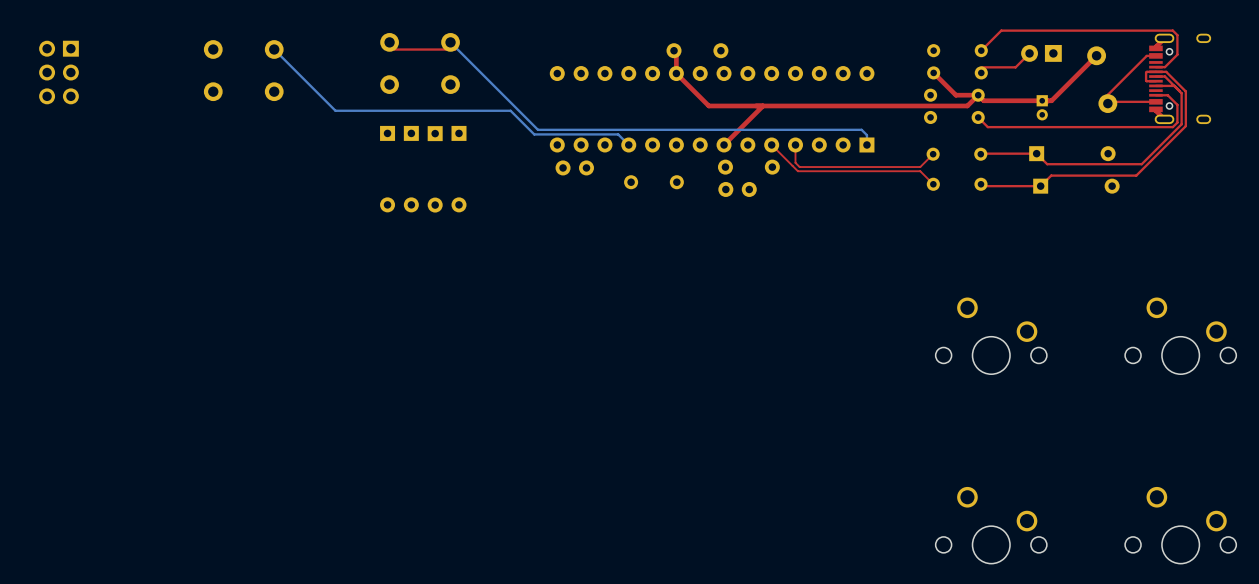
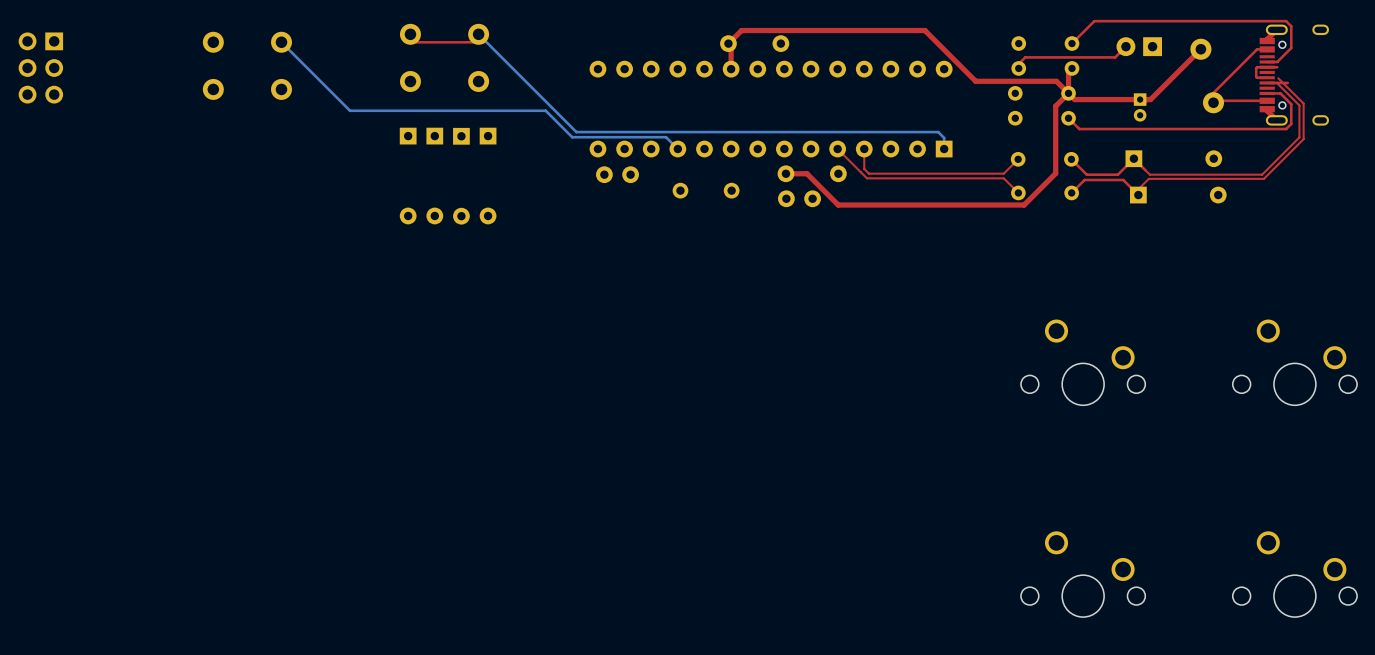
top track: none -> (728, 43) (741, 30) (924, 30) (975, 81) (1056, 81) (1068, 93) (1067, 68)
top track: (1019, 63) (1015, 67) (981, 67) -> (1115, 57) (1025, 57) (1014, 68)
top track: (1164, 71) (1185, 91) (1185, 126) (1136, 175) (1051, 175) (1040, 186) (982, 186) (980, 184) -> (1278, 78) (1303, 103) (1303, 139) (1263, 178) (1148, 178) (1138, 189) (1138, 195) (1123, 180) (1084, 180) (1071, 192)
top track: (933, 72) (955, 95) (978, 95) -> none
top track: (676, 73) (708, 105) (967, 105) -> (785, 173) (807, 173) (838, 205) (1024, 205) (1055, 173) (1056, 105)
top track: (1155, 76) (1164, 76) (1181, 93) (1181, 124) (1141, 164) (1047, 164) -> (1276, 82) (1299, 105) (1299, 137) (1262, 174) (1149, 174) (1145, 170)
top track: (763, 105) (724, 144) -> none
top track: (1036, 153) (980, 154) -> (1133, 160) (1133, 158) (1117, 174) (1086, 174) (1071, 159)

